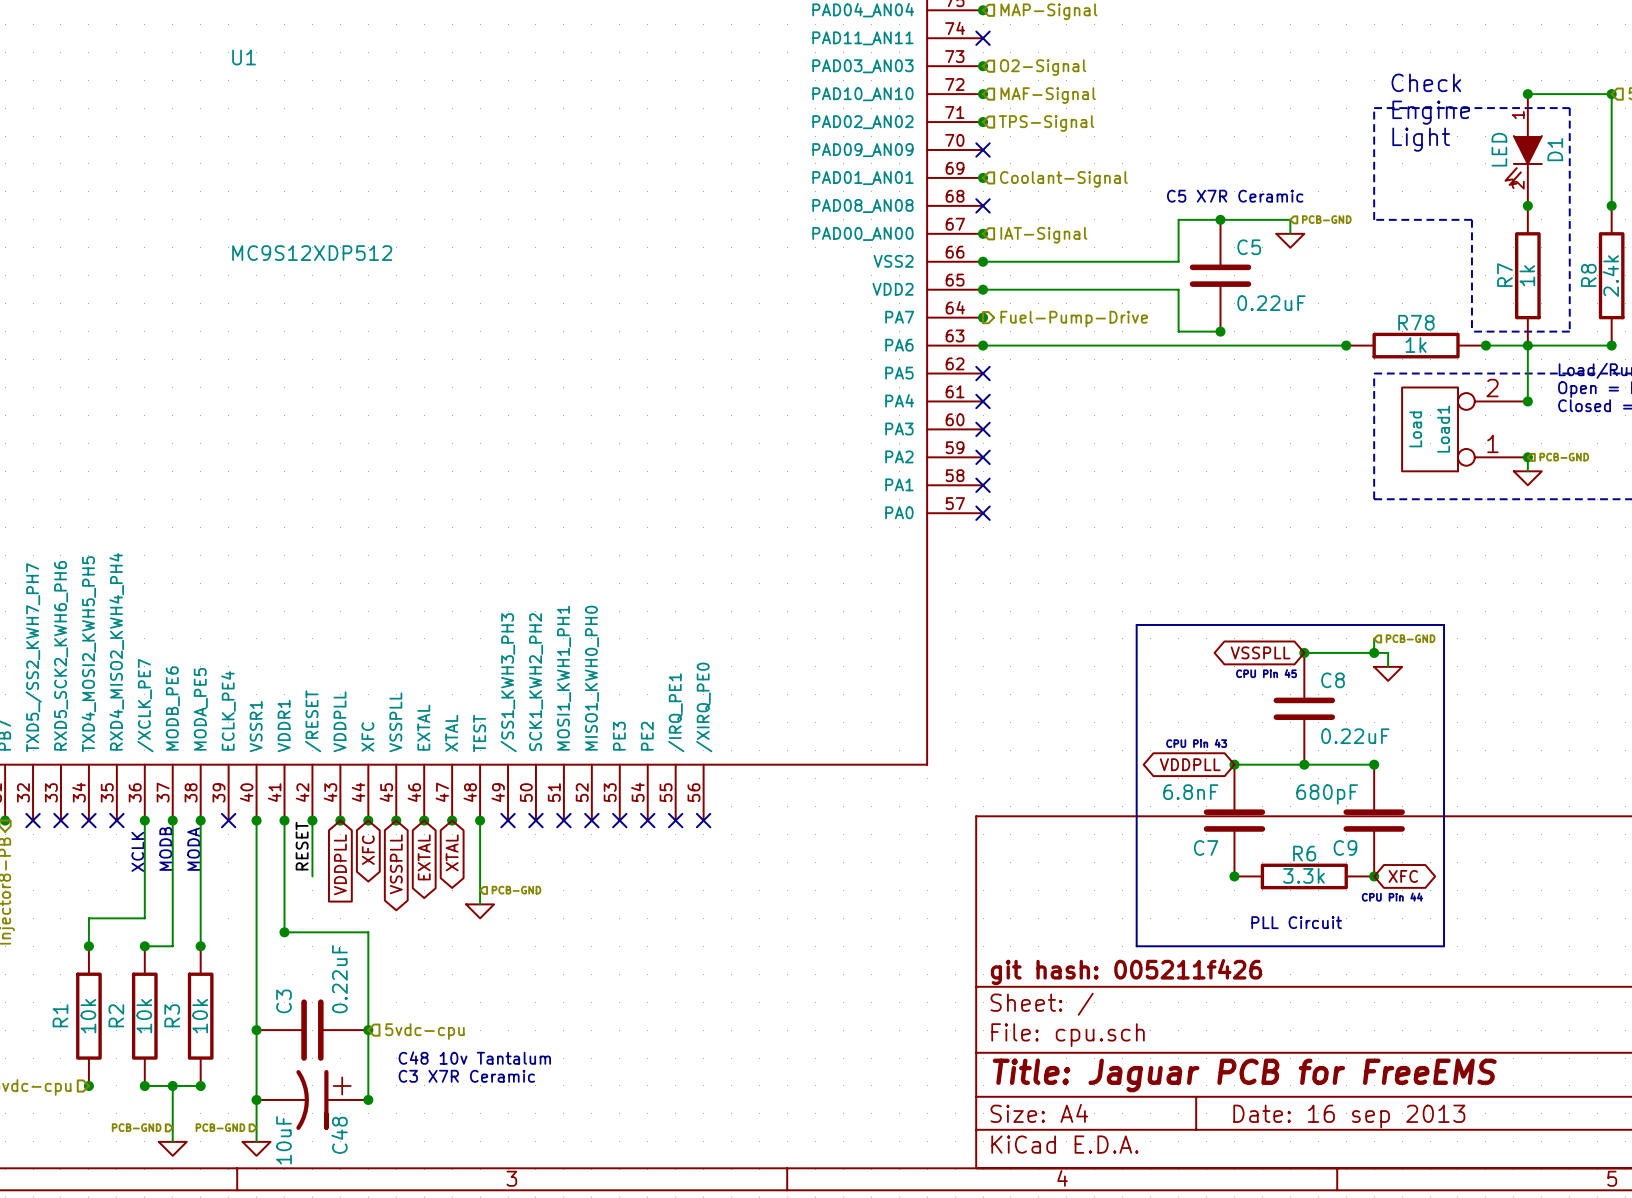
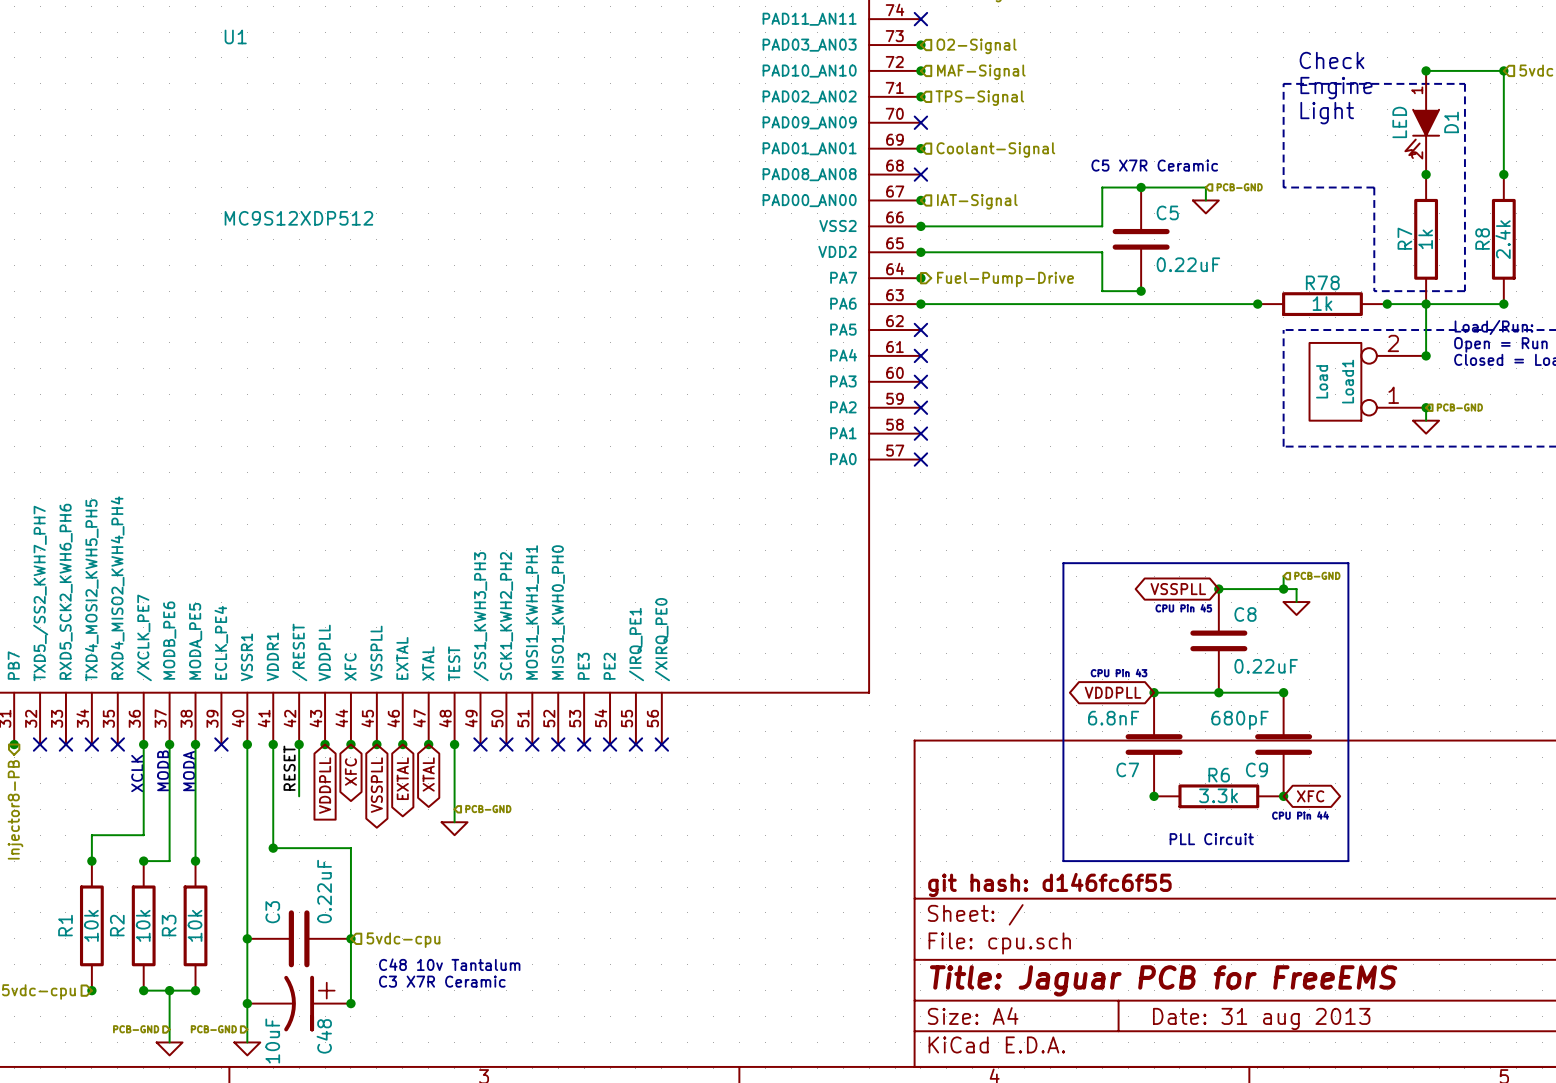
title block: git hash: 005211f426 (1126, 972) -> git hash: d146fc6f55 (1049, 884)
title block: Date: 16 sep 2013 (1349, 1116) -> Date: 31 aug 2013 (1261, 1018)

